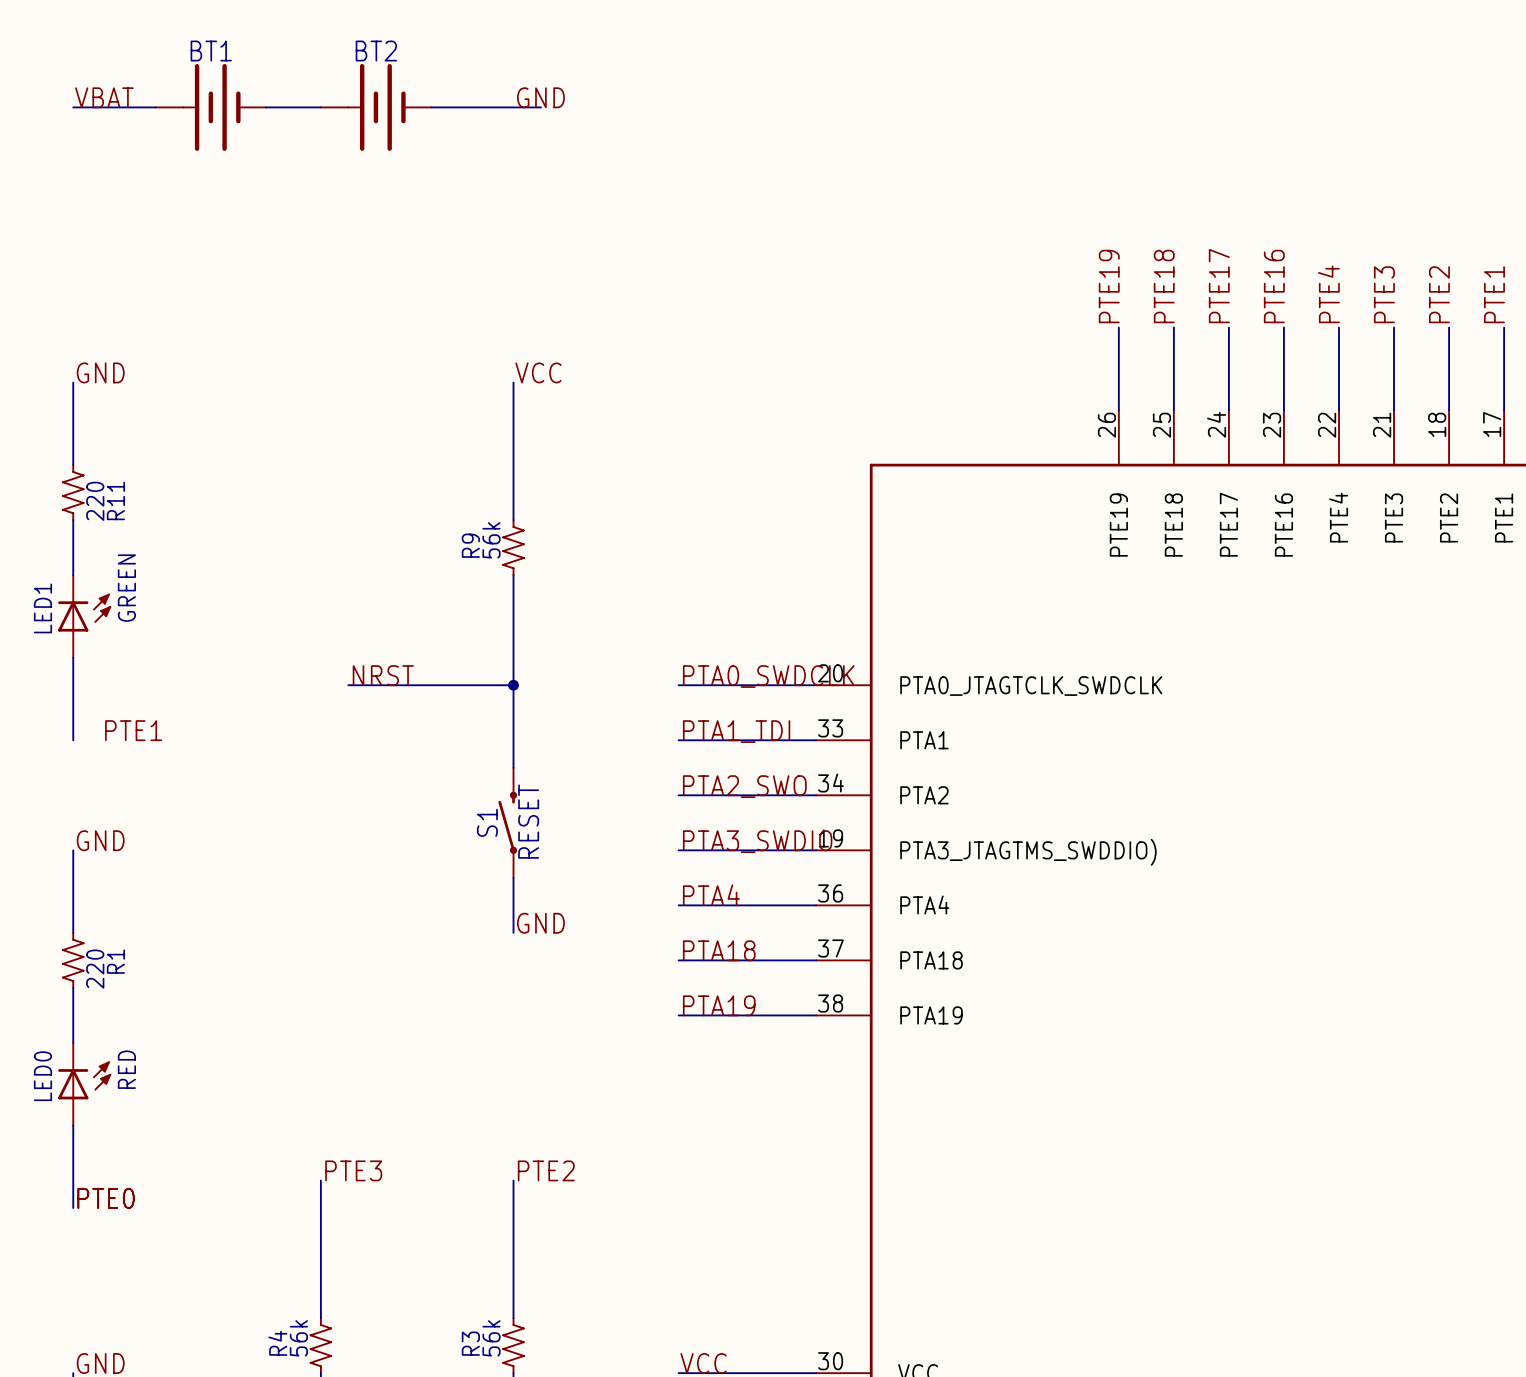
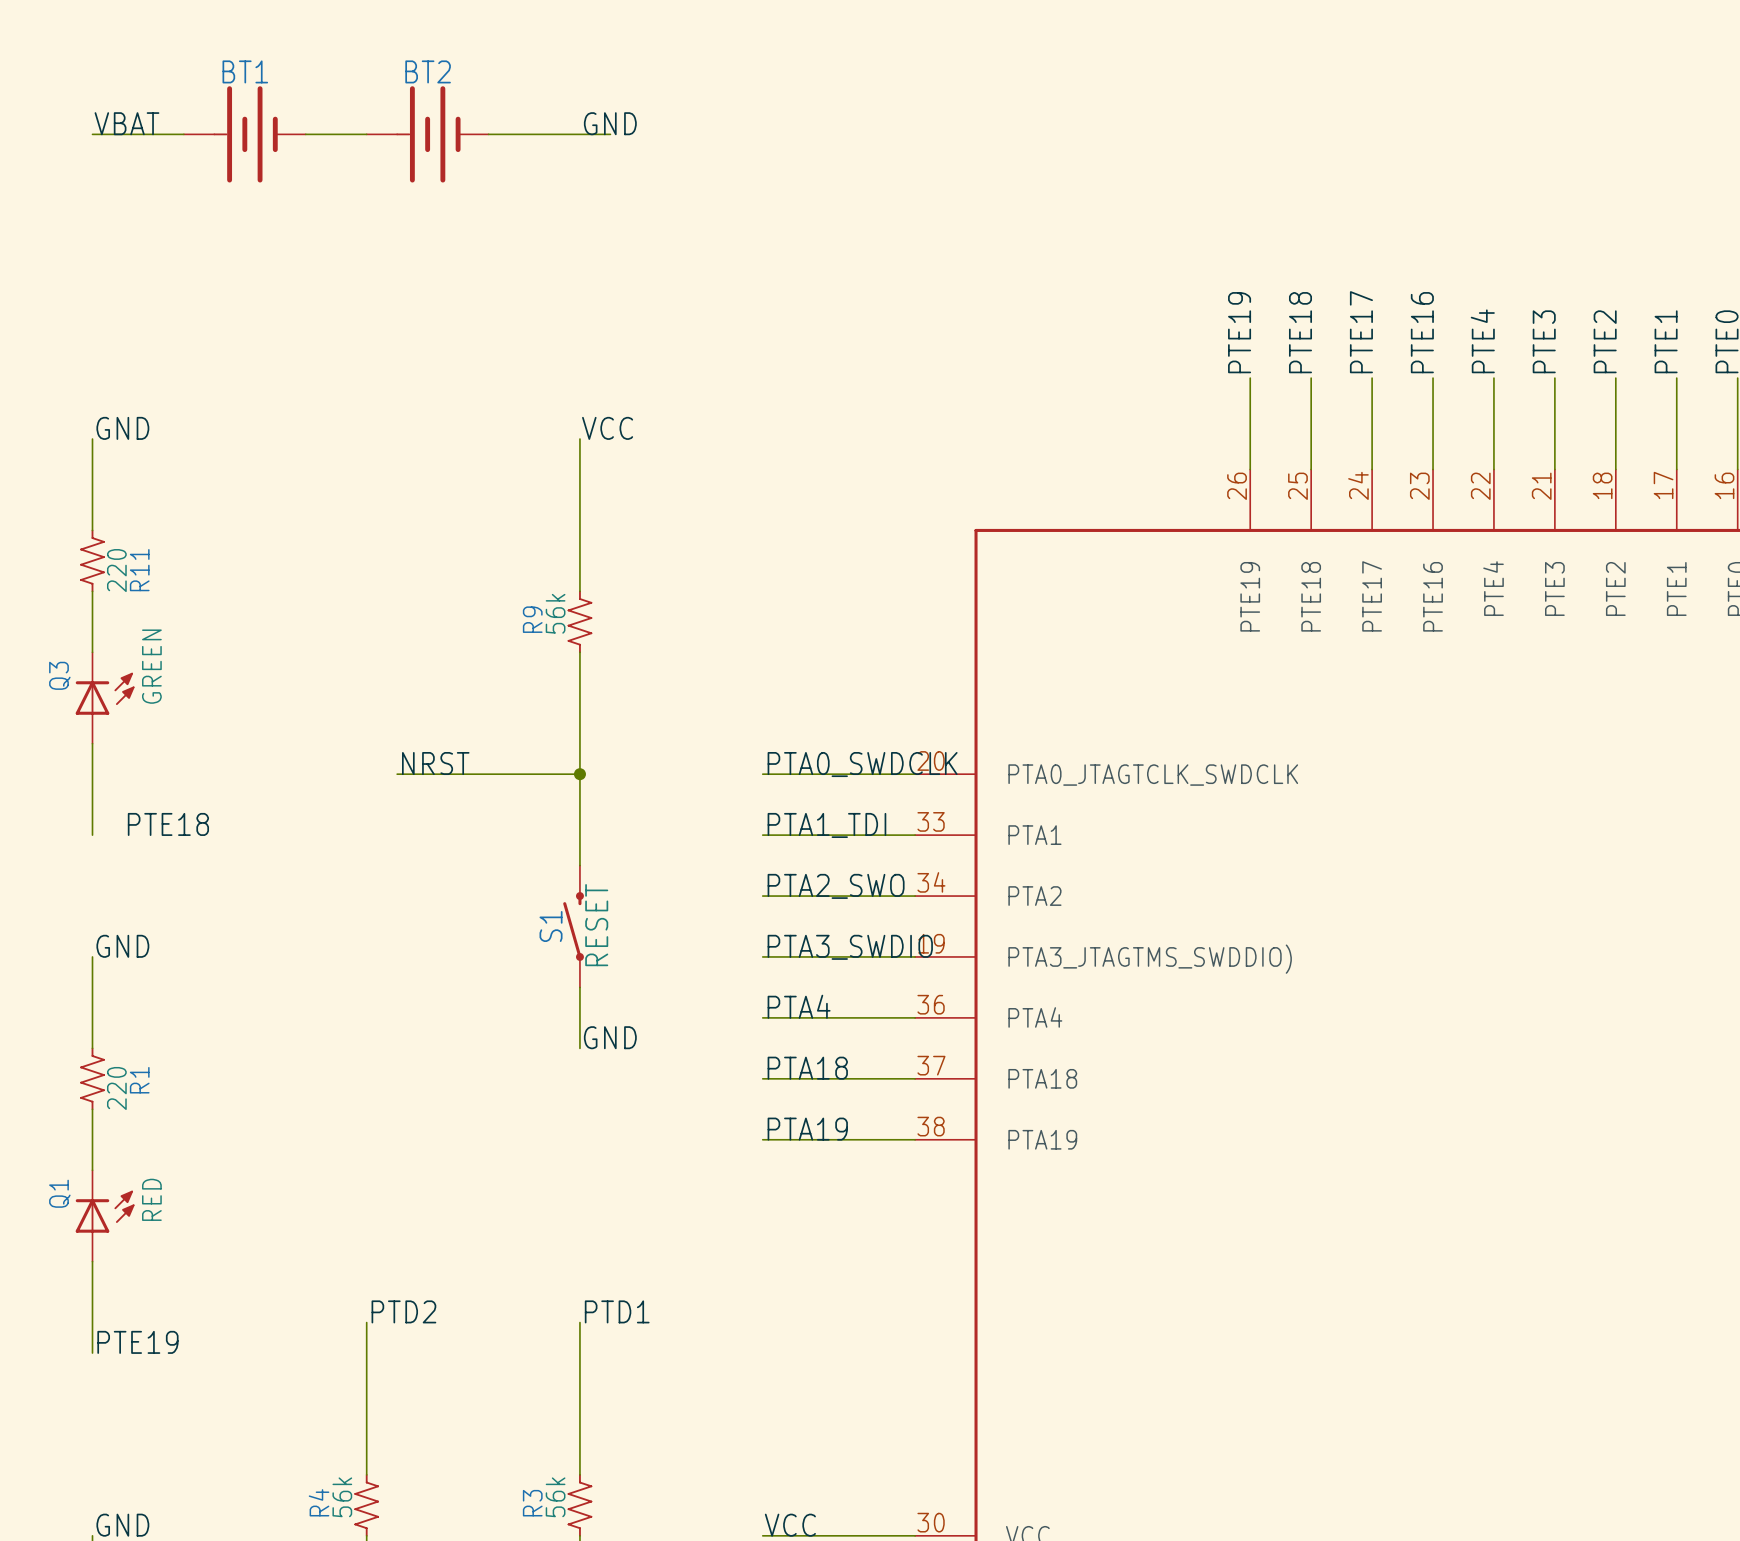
LED1 name: LED1 (42, 608) -> Q3 (59, 675)
label: PTE1 (133, 730) -> PTE18 (168, 824)
LED0 name: LED0 (42, 1076) -> Q1 (59, 1193)
label: PTE3 (353, 1170) -> PTD2 (403, 1311)
label: PTE2 (546, 1170) -> PTD1 (617, 1311)
label: PTE0 (106, 1198) -> PTE19 (137, 1342)

